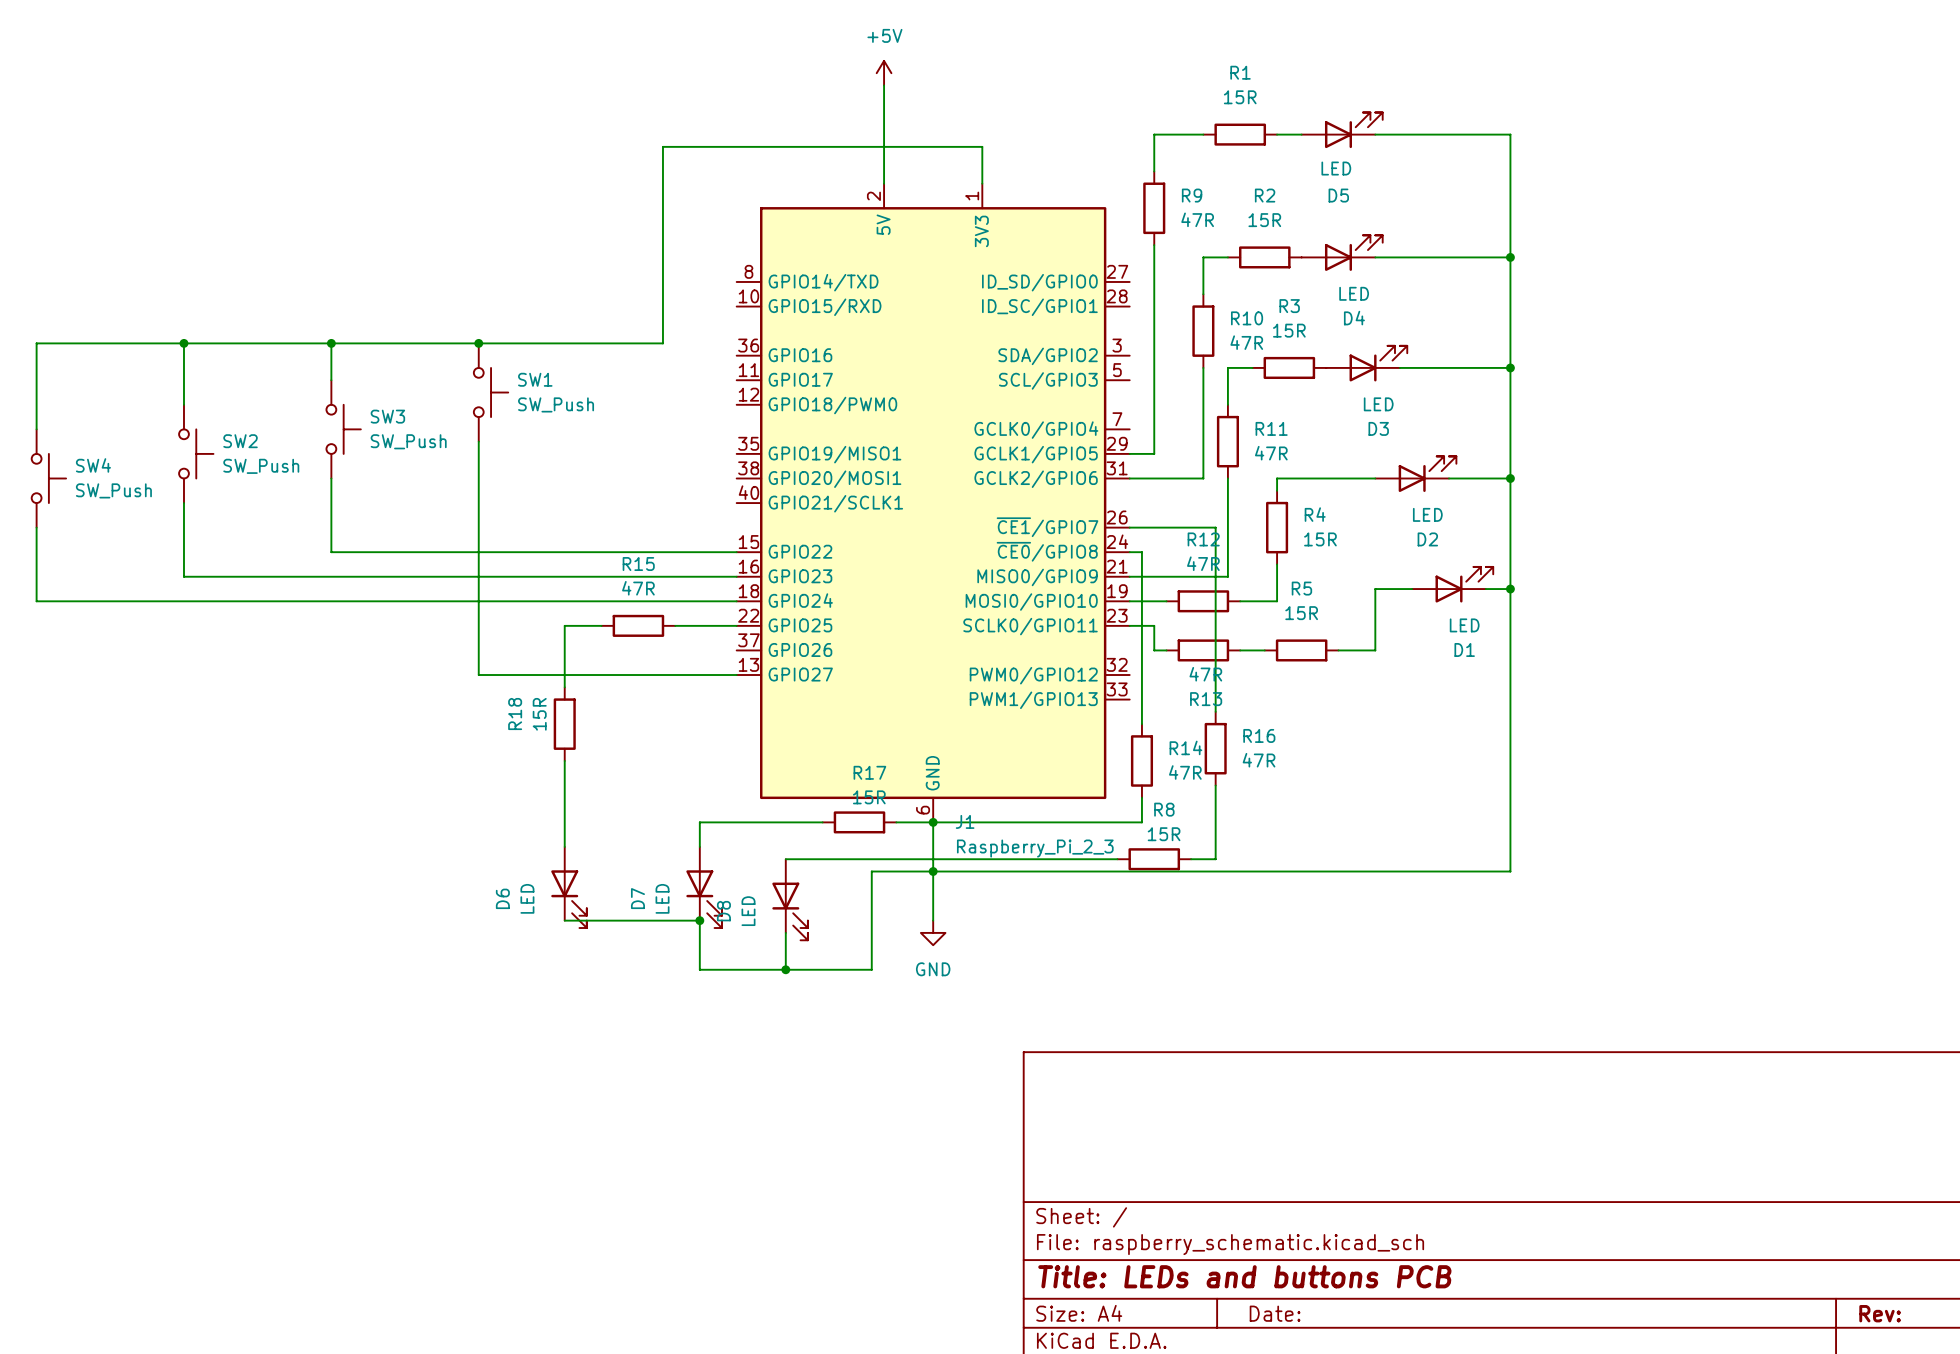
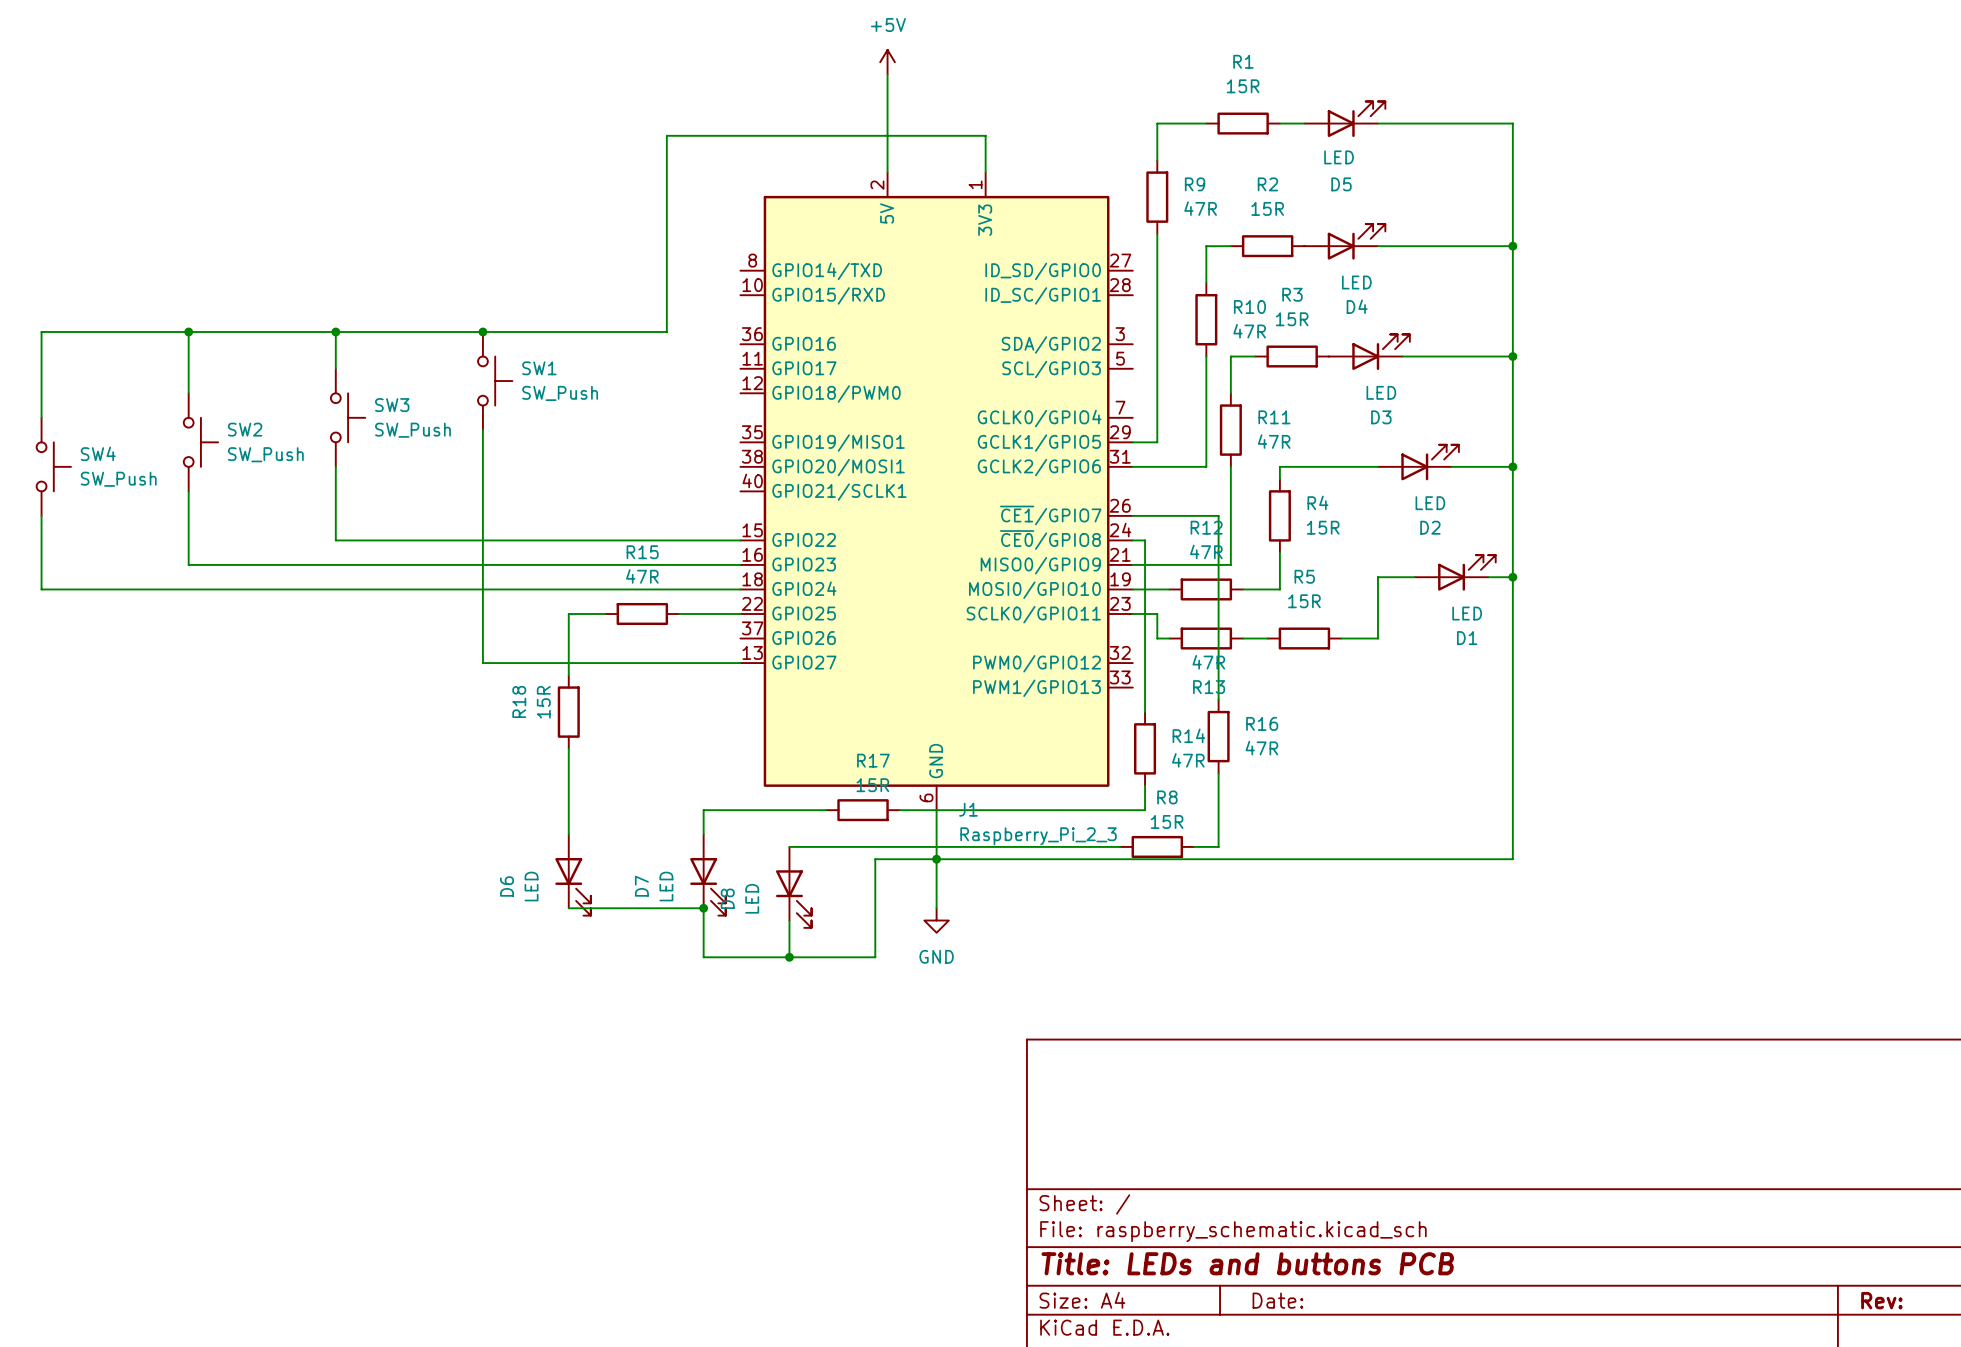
junction: (933, 822) -> none

